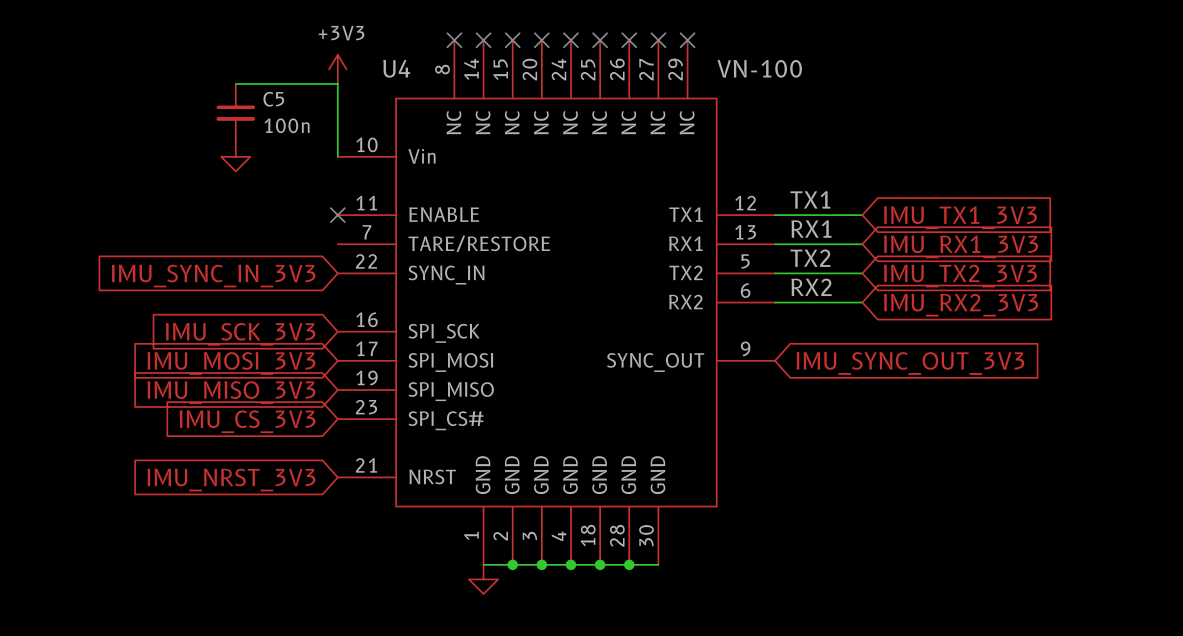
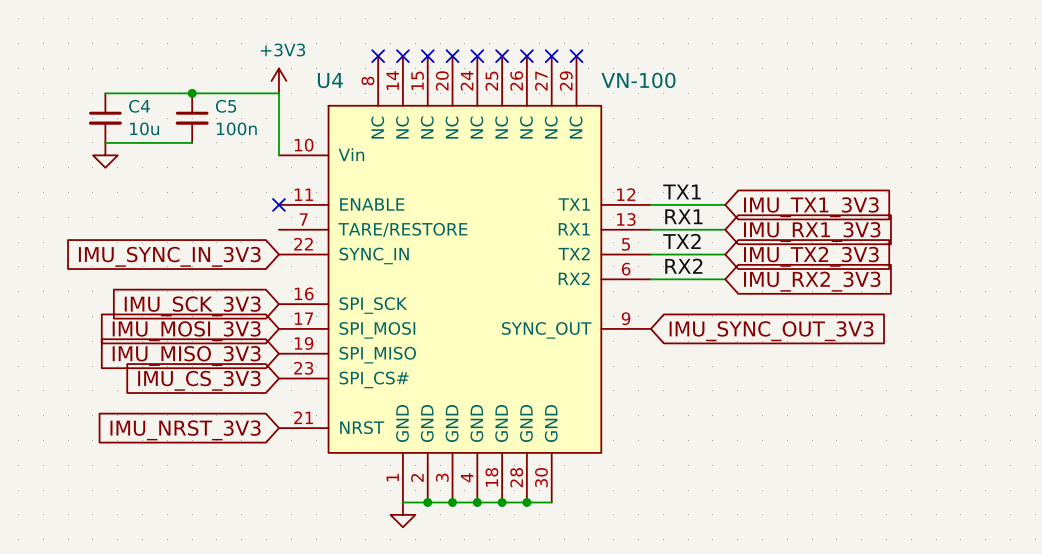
wire: none -> (105, 93) (192, 93)
junction: none -> (192, 93)
C4: none -> 10u (105, 118)
wire: none -> (105, 142) (192, 142)
power symbol position: (235, 156) -> (105, 155)

